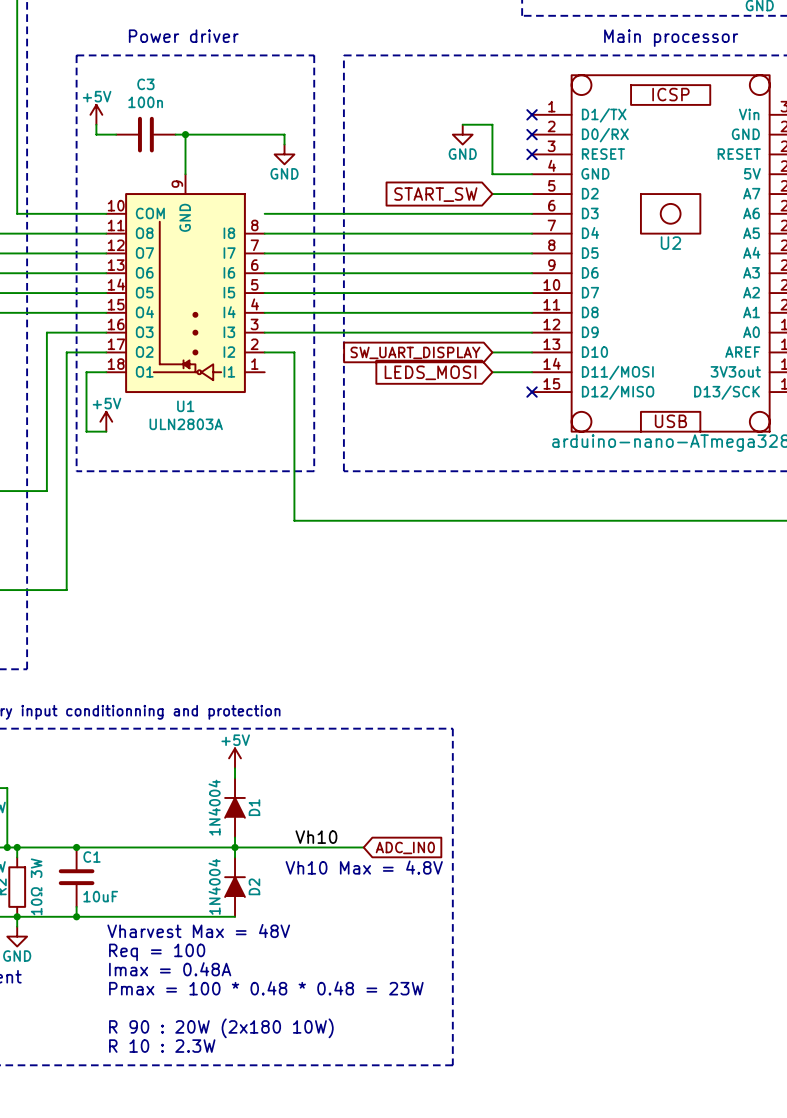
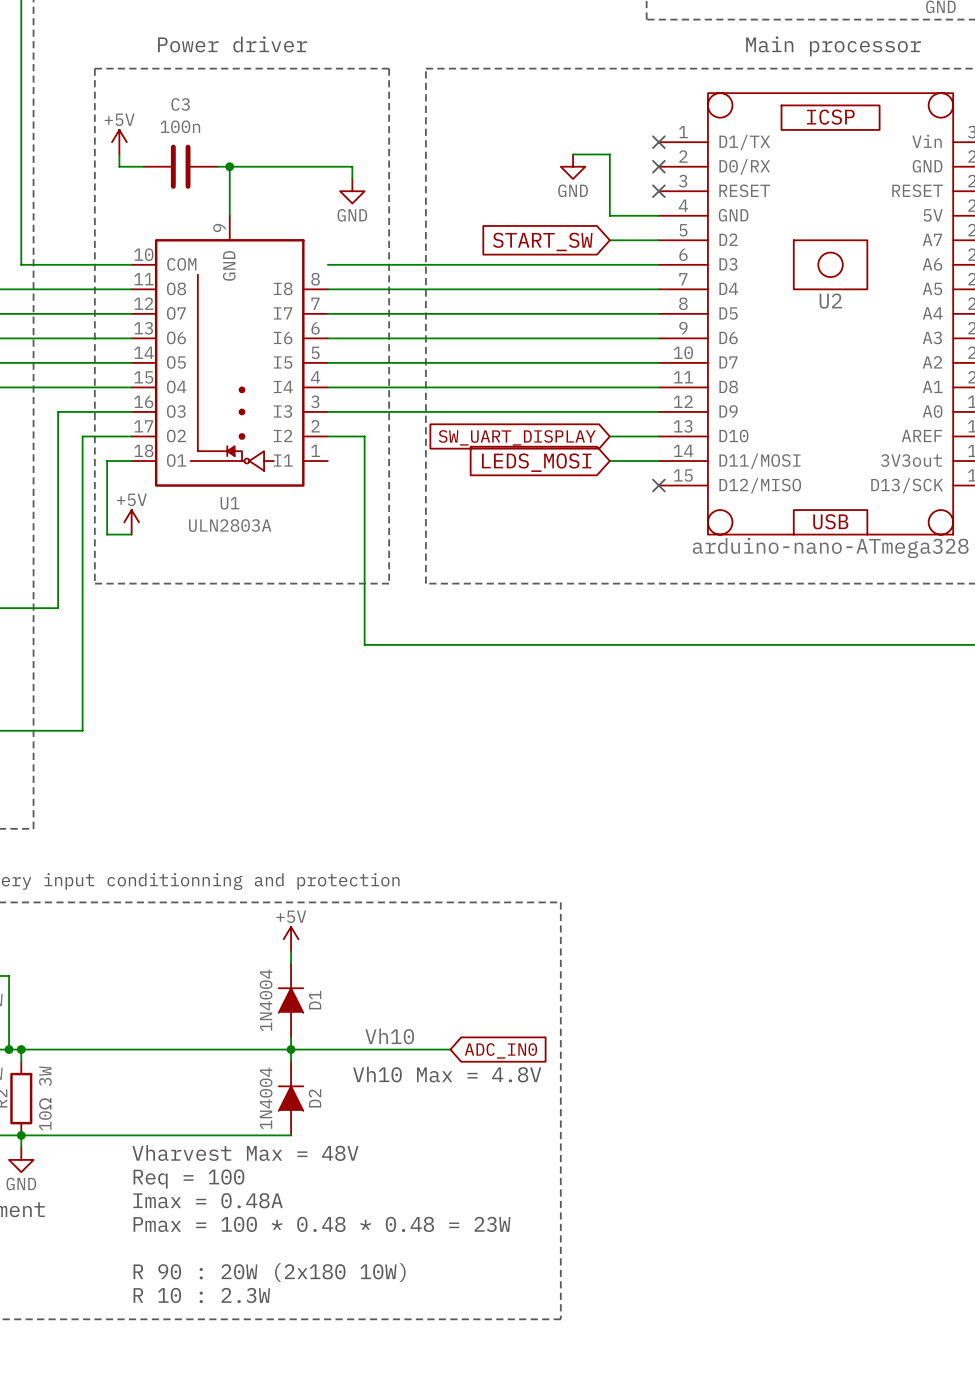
junction: (76, 847) -> none
C1: 10uF (76, 877) -> none
wire: (76, 906) (76, 916) -> none
junction: (76, 916) -> none

